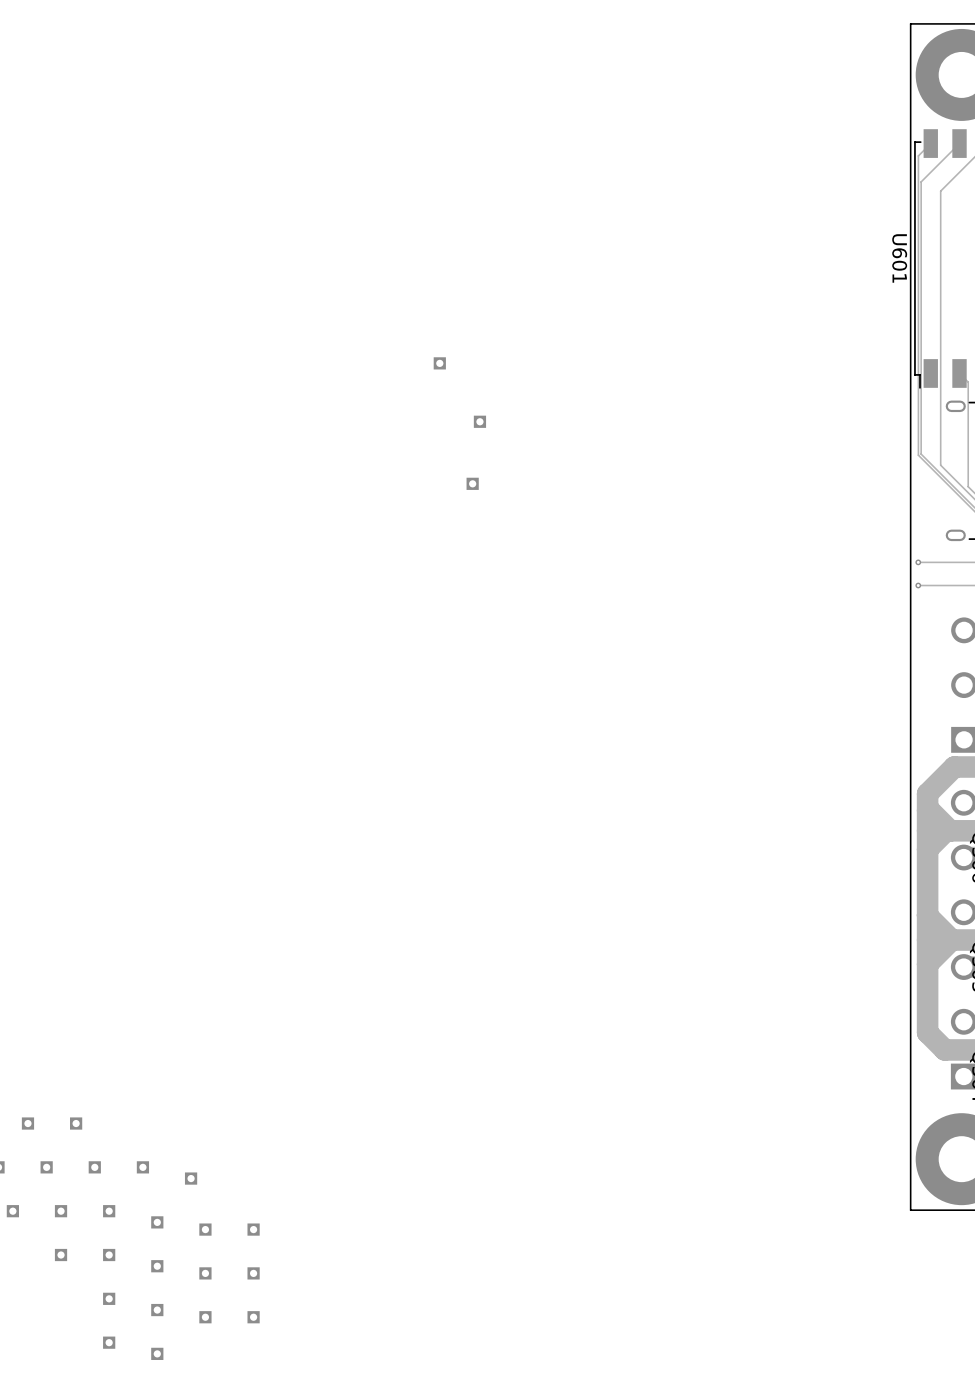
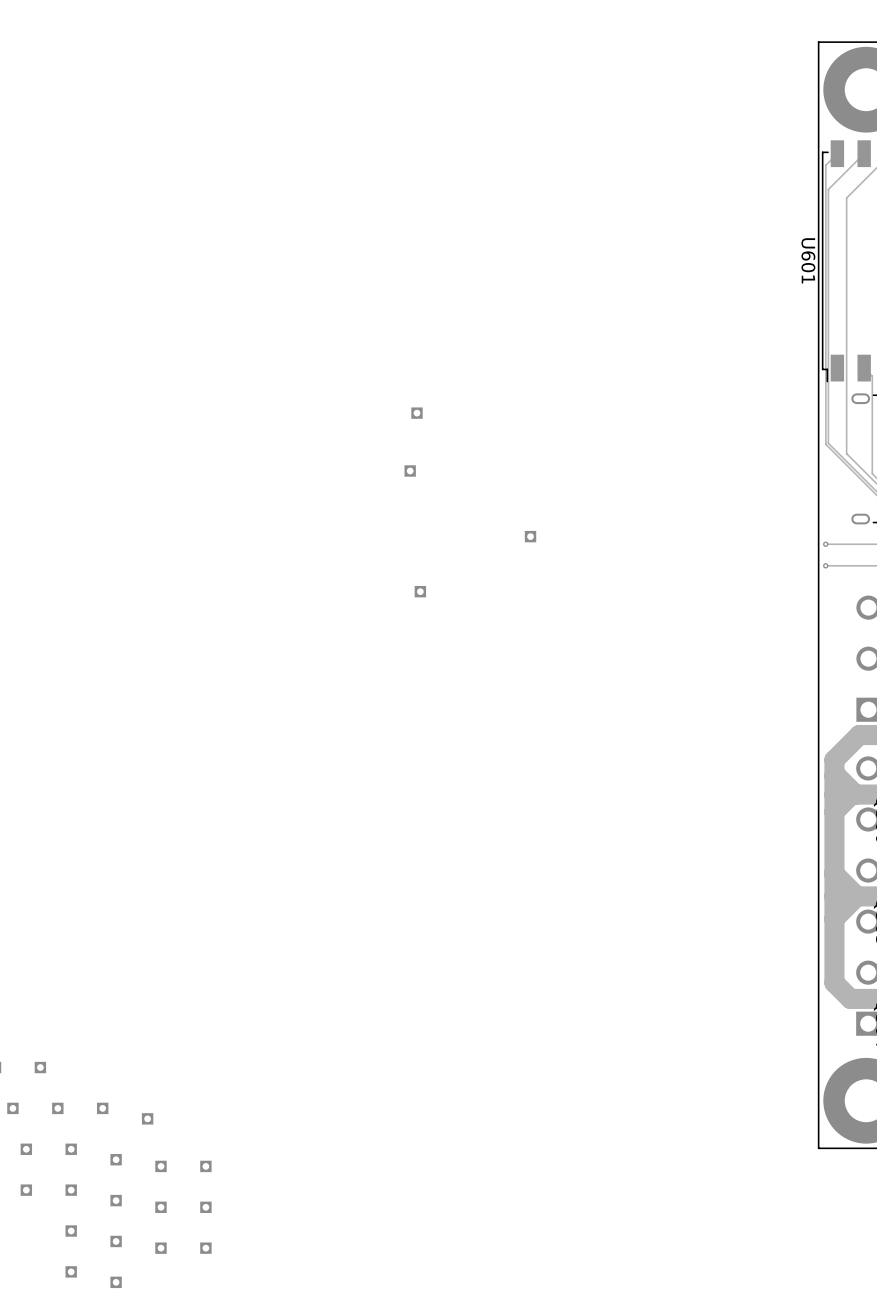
part: (439, 363) -> none
part: none -> (530, 536)
part: none -> (420, 591)

